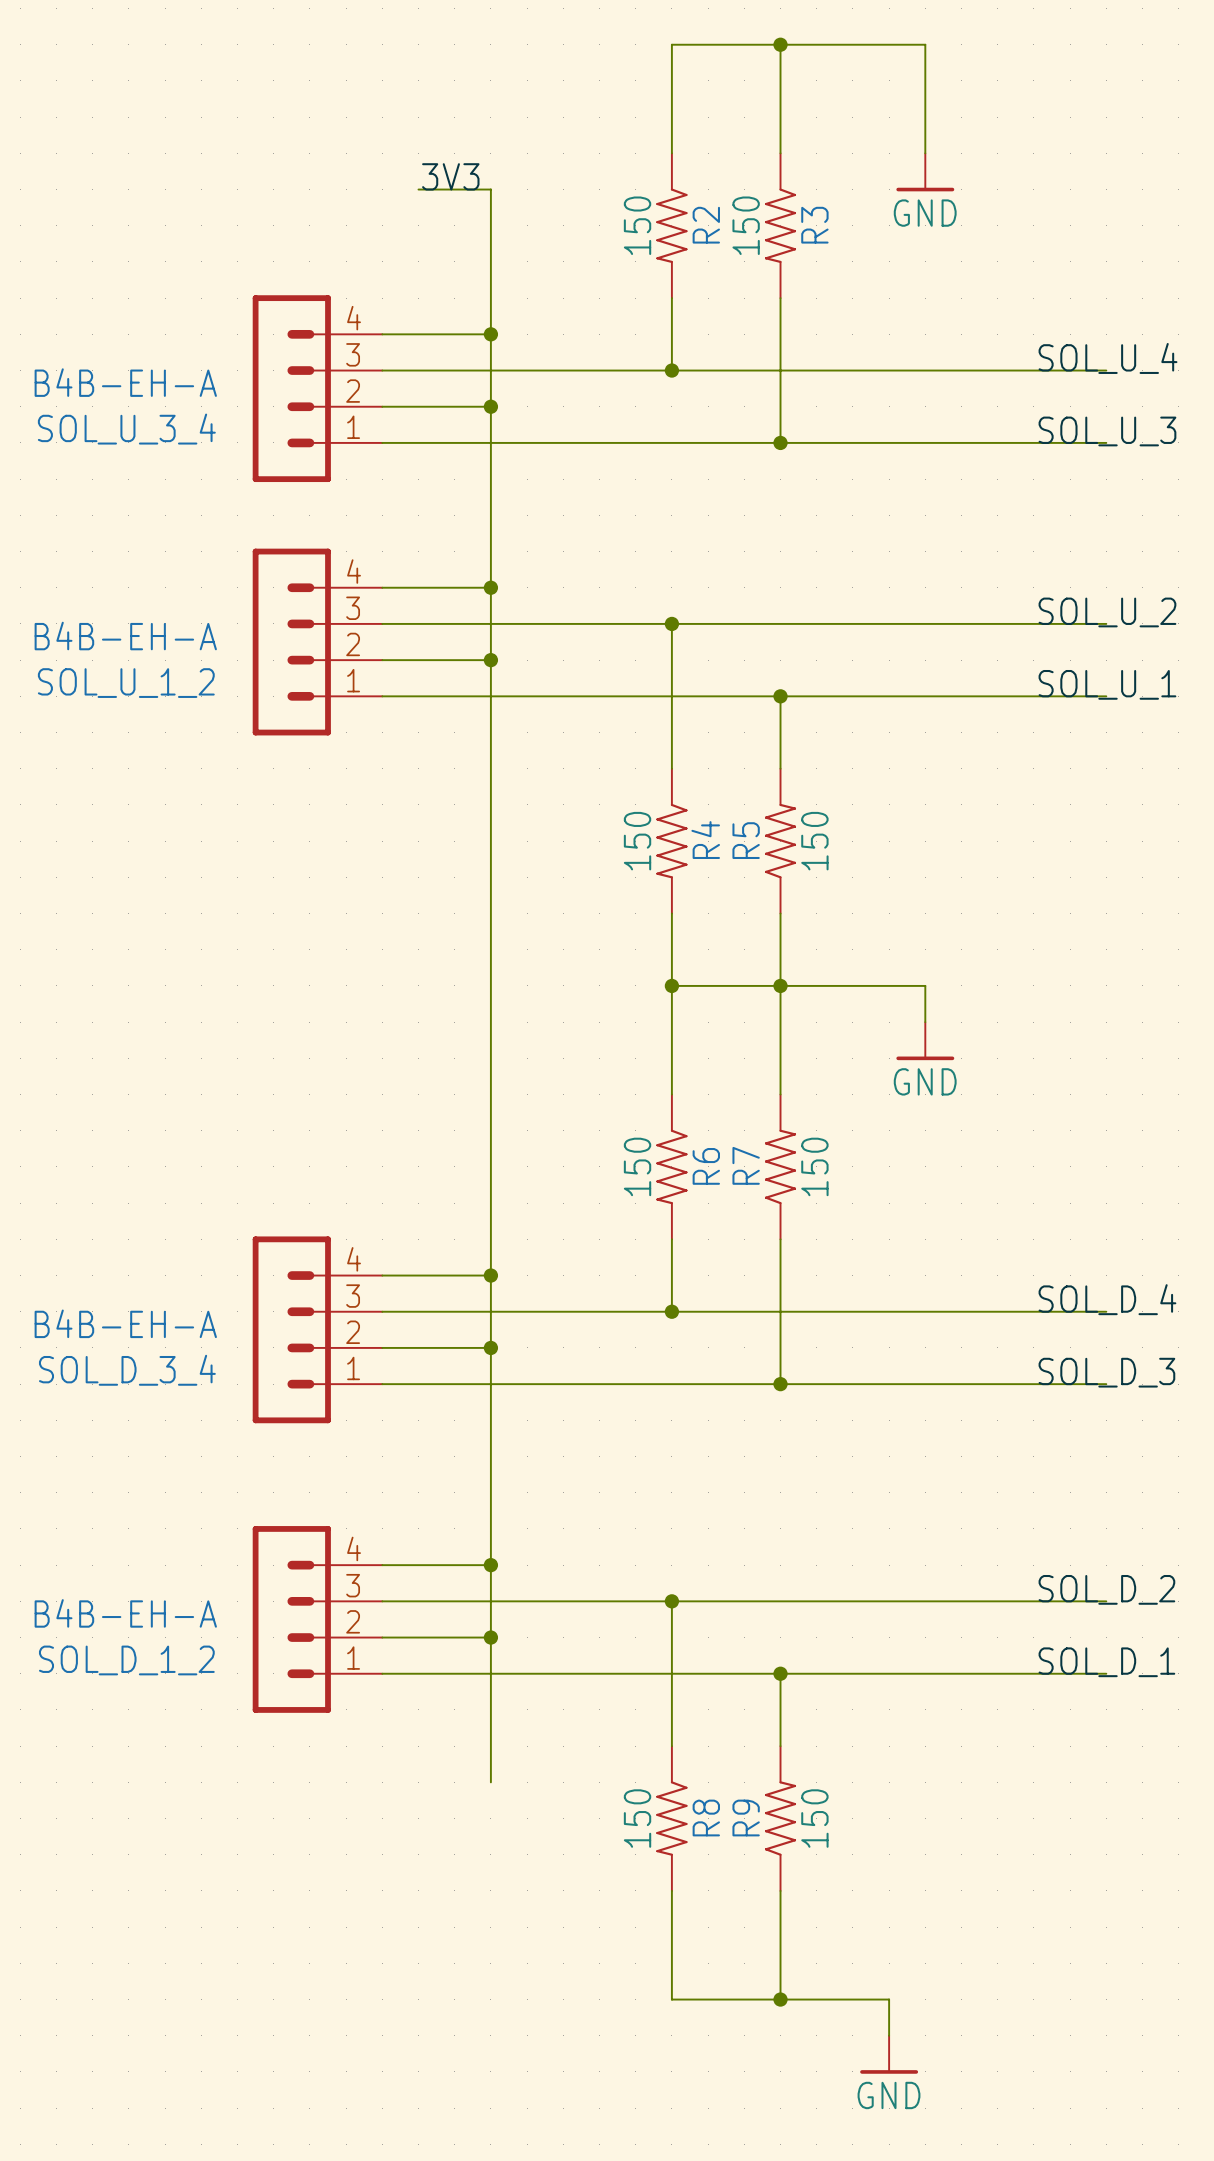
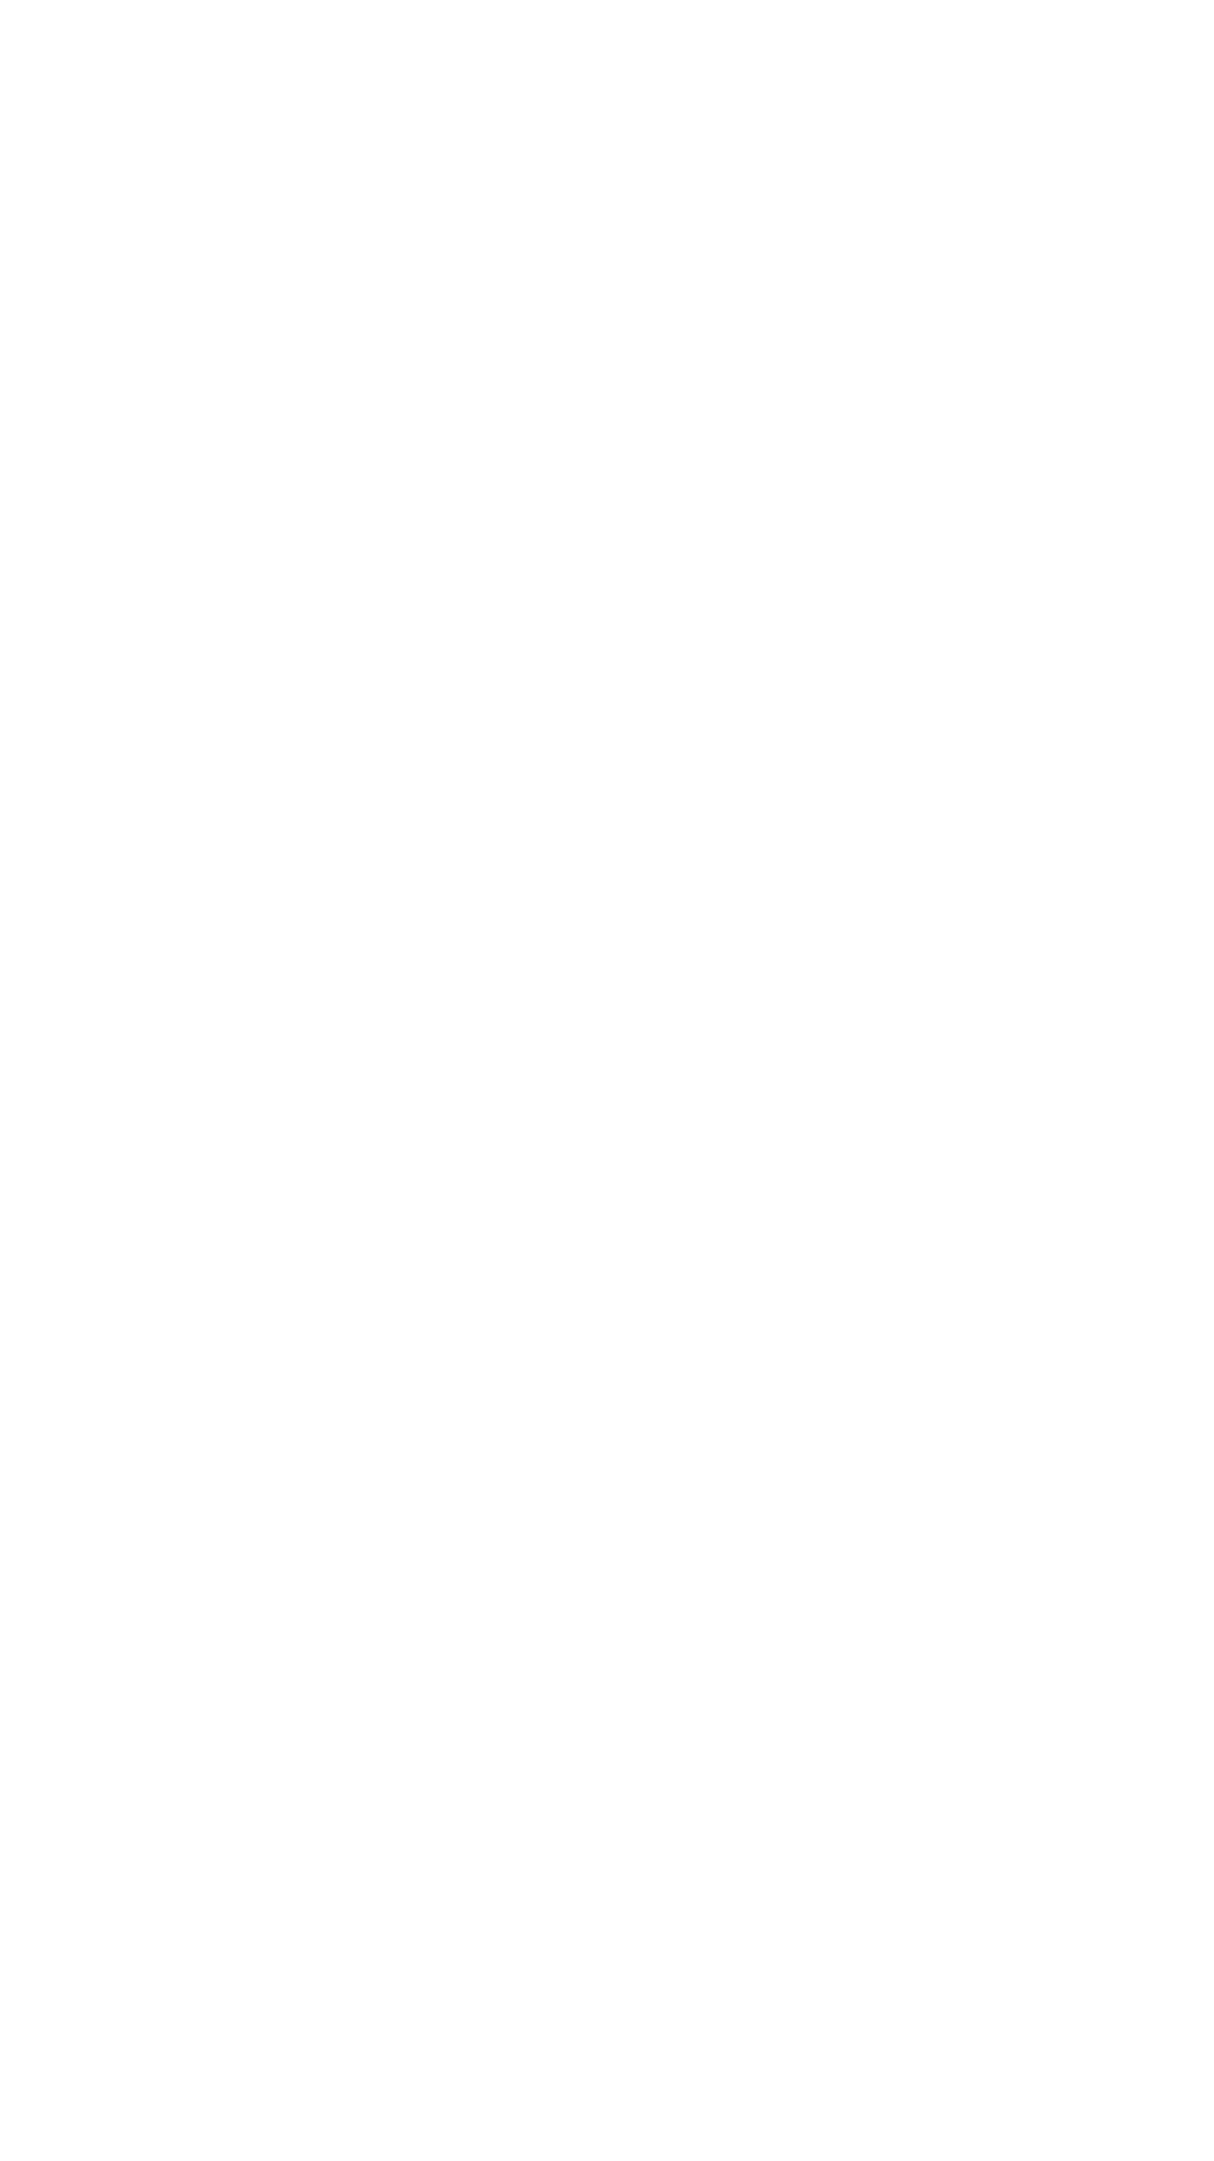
wire: (780, 44) (780, 153) -> none
junction: (780, 44) -> none
wire: (671, 153) (671, 44) (925, 44) (925, 153) -> none
power symbol: GND (925, 172) -> none
label: 3V3 (450, 176) -> none
wire: (418, 189) (490, 189) (490, 1782) -> none
R2: 150 (671, 225) -> none
R3: 150 (780, 225) -> none
wire: (671, 298) (671, 370) -> none
wire: (780, 298) (780, 442) -> none
wire: (382, 334) (490, 334) -> none
junction: (490, 334) -> none
label: SOL_U_4 (1108, 358) -> none
wire: (382, 370) (1106, 370) -> none
junction: (671, 370) -> none
SOL_U_3_4: B4B-EH-A (317, 388) -> none
wire: (382, 406) (490, 406) -> none
junction: (490, 406) -> none
label: SOL_U_3 (1107, 431) -> none
wire: (382, 442) (1106, 442) -> none
junction: (780, 442) -> none
wire: (382, 587) (490, 587) -> none
junction: (490, 587) -> none
label: SOL_U_2 (1107, 612) -> none
wire: (382, 623) (1106, 623) -> none
wire: (671, 623) (671, 768) -> none
junction: (671, 623) -> none
SOL_U_1_2: B4B-EH-A (317, 642) -> none
wire: (382, 660) (490, 660) -> none
junction: (490, 660) -> none
label: SOL_U_1 (1107, 684) -> none
wire: (382, 696) (1106, 696) -> none
wire: (780, 696) (780, 768) -> none
junction: (780, 696) -> none
R4: 150 (671, 841) -> none
R5: 150 (780, 841) -> none
wire: (671, 913) (671, 1094) -> none
wire: (780, 913) (780, 1094) -> none
wire: (671, 985) (925, 985) (925, 1022) -> none
junction: (671, 985) -> none
junction: (780, 985) -> none
power symbol: GND (925, 1041) -> none
R6: 150 (671, 1166) -> none
R7: 150 (780, 1166) -> none
wire: (671, 1239) (671, 1311) -> none
wire: (780, 1239) (780, 1384) -> none
wire: (382, 1275) (490, 1275) -> none
junction: (490, 1275) -> none
label: SOL_D_4 (1107, 1299) -> none
wire: (382, 1311) (1106, 1311) -> none
junction: (671, 1311) -> none
SOL_D_3_4: B4B-EH-A (317, 1329) -> none
wire: (382, 1347) (490, 1347) -> none
junction: (490, 1347) -> none
label: SOL_D_3 (1106, 1372) -> none
wire: (382, 1384) (1106, 1384) -> none
junction: (780, 1384) -> none
wire: (382, 1565) (490, 1565) -> none
junction: (490, 1565) -> none
label: SOL_D_2 (1106, 1589) -> none
wire: (382, 1601) (1106, 1601) -> none
wire: (671, 1601) (671, 1746) -> none
junction: (671, 1601) -> none
SOL_D_1_2: B4B-EH-A (317, 1619) -> none
wire: (382, 1637) (490, 1637) -> none
junction: (490, 1637) -> none
label: SOL_D_1 (1106, 1662) -> none
wire: (382, 1673) (1106, 1673) -> none
wire: (780, 1673) (780, 1746) -> none
junction: (780, 1673) -> none
R8: 150 (671, 1818) -> none
R9: 150 (780, 1818) -> none
wire: (671, 1890) (671, 1999) (889, 1999) (889, 2035) -> none
wire: (780, 1890) (780, 1999) -> none
junction: (780, 1999) -> none
power symbol: GND (889, 2054) -> none

